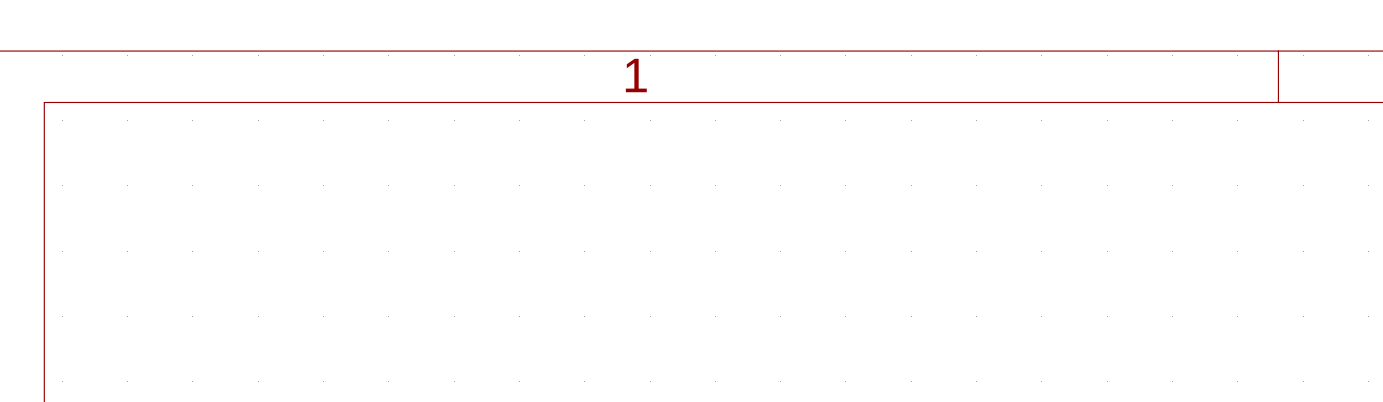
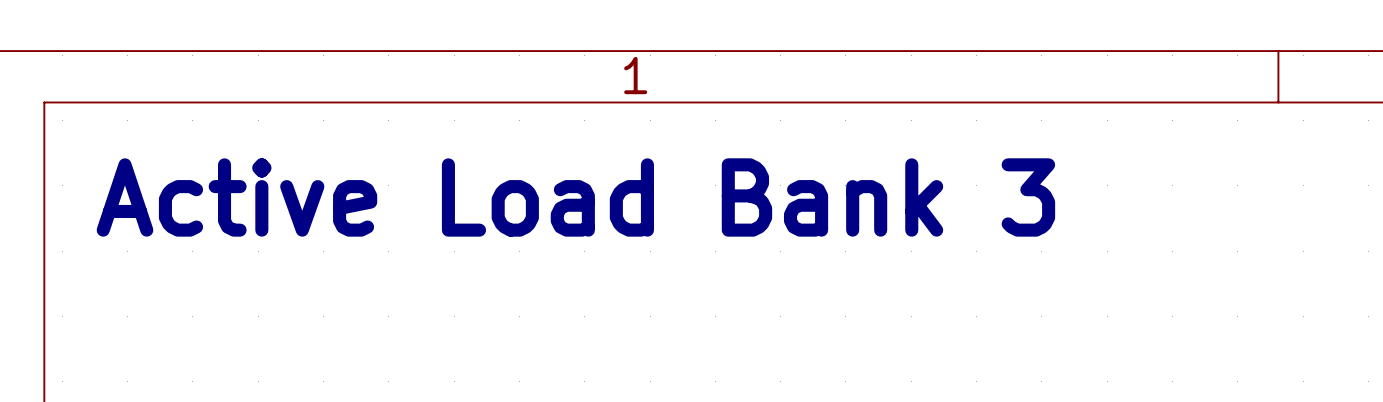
text: none -> Active Load Bank 3 (575, 197)

